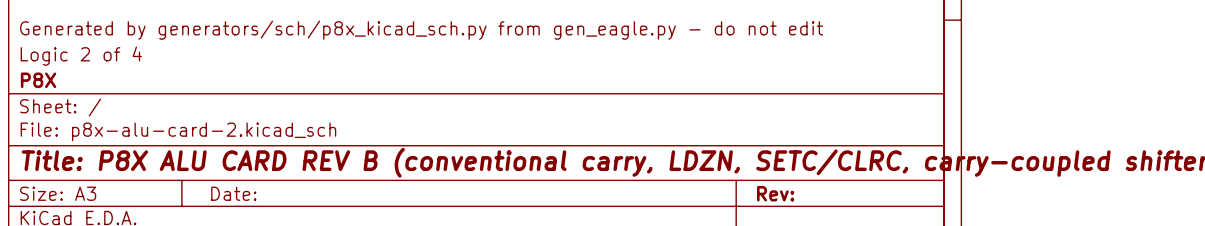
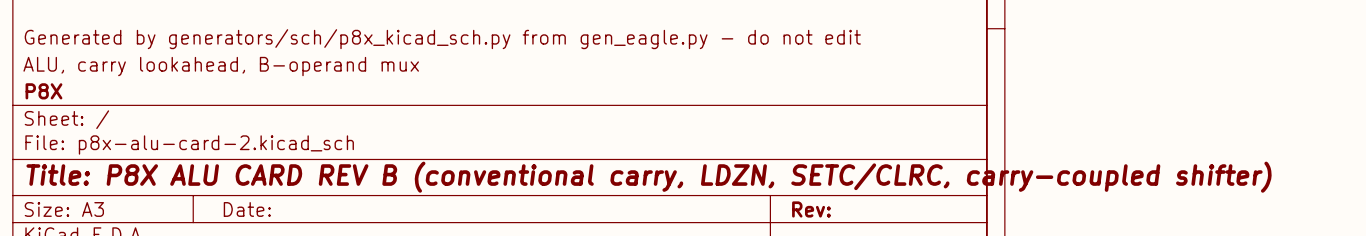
title block: Logic 2 of 4 (81, 56) -> ALU, carry lookahead, B-operand mux (221, 66)

